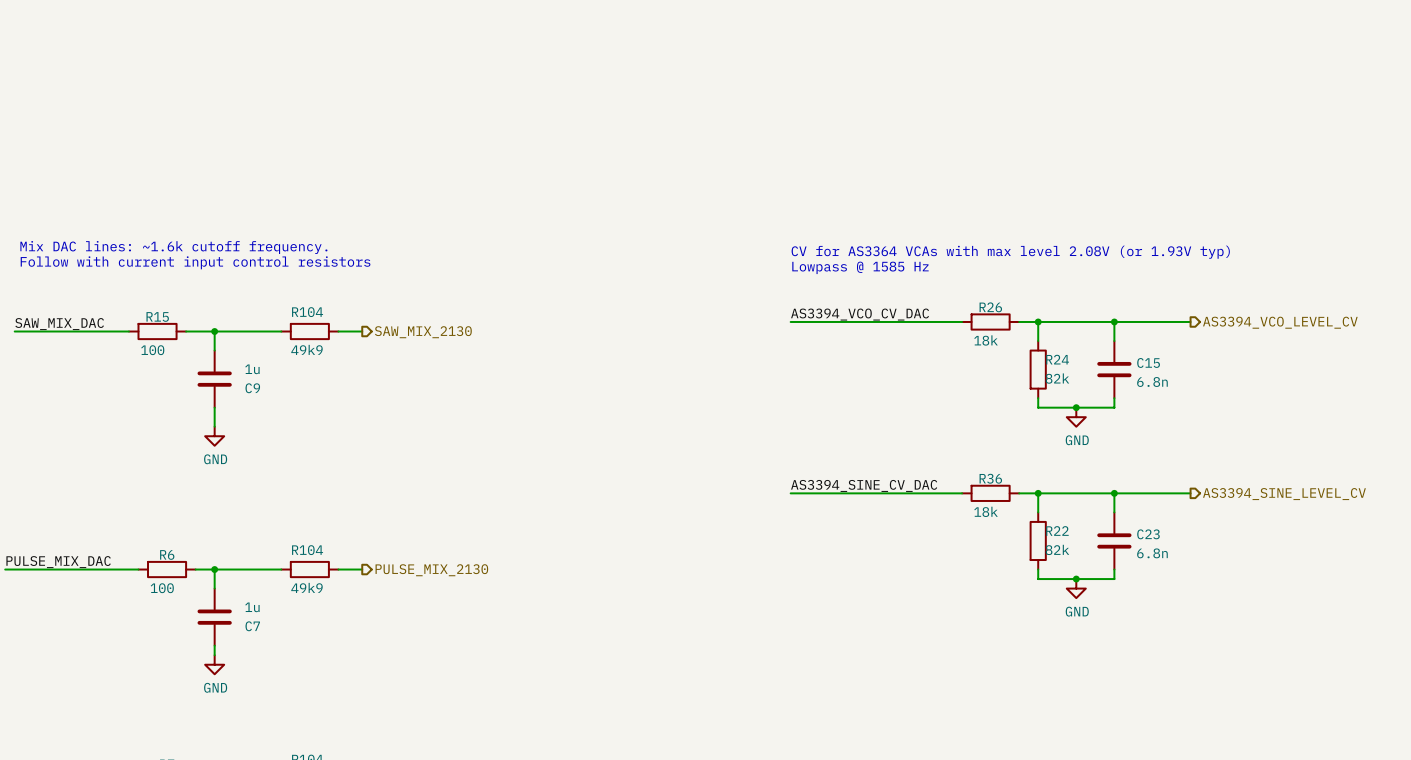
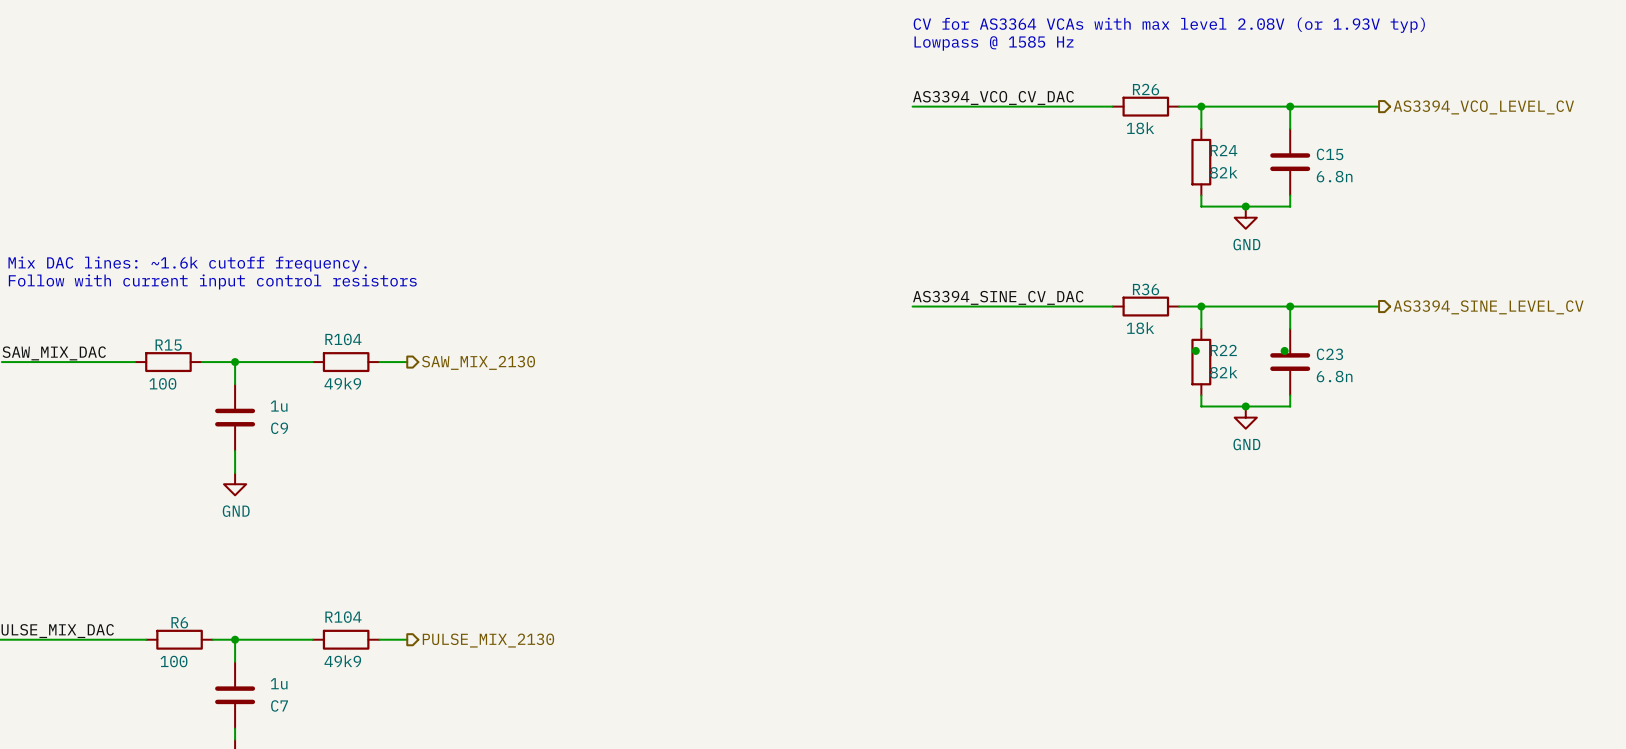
text: none -> CV for AS3364 VCAs with max level 2.08V (or 1.93V typ) (1169, 25)
text: none -> Lowpass @ 1585 Hz (994, 43)
label: none -> AS3394_VCO_CV_DAC (993, 97)
wire: none -> (912, 106) (1112, 106)
wire: none -> (1179, 106) (1379, 106)
wire: none -> (1201, 106) (1201, 128)
junction: none -> (1201, 106)
wire: none -> (1290, 106) (1290, 128)
junction: none -> (1290, 106)
hierarchical label: none -> AS3394_VCO_LEVEL_CV (1483, 107)
wire: none -> (1201, 195) (1201, 206) (1290, 206) (1290, 195)
junction: none -> (1245, 206)
power symbol: none -> GND (1245, 217)
text: CV for AS3364 VCAs with max level 2.08V (or 1.93V typ) (1010, 252) -> none
text: Lowpass @ 1585 Hz (860, 267) -> none
label: none -> AS3394_SINE_CV_DAC (998, 297)
junction: none -> (1201, 306)
junction: none -> (1290, 306)
hierarchical label: none -> AS3394_SINE_LEVEL_CV (1488, 307)
label: AS3394_VCO_CV_DAC (860, 314) -> none
wire: (790, 321) (962, 321) -> (912, 306) (1112, 306)
R26 position: (990, 321) -> (1145, 106)
wire: (1019, 321) (1190, 321) -> (1179, 306) (1379, 306)
wire: (1038, 321) (1038, 341) -> (1201, 306) (1201, 328)
wire: (1114, 321) (1114, 341) -> (1290, 306) (1290, 328)
hierarchical label: AS3394_VCO_LEVEL_CV (1280, 322) -> none
R24 position: (1038, 369) -> (1201, 162)
C15 position: (1114, 369) -> (1290, 162)
wire: (1038, 398) (1038, 407) (1114, 407) (1114, 398) -> (1201, 395) (1201, 406) (1290, 406) (1290, 395)
junction position: (1076, 407) -> (1245, 406)
power symbol position: GND (1076, 417) -> GND (1245, 417)
label: AS3394_SINE_CV_DAC (864, 485) -> none
wire: (790, 493) (962, 493) -> none
R36 position: (990, 493) -> (1145, 306)
wire: (1019, 493) (1190, 493) -> none
wire: (1038, 493) (1038, 512) -> none
junction: (1038, 493) -> none
wire: (1114, 493) (1114, 512) -> none
junction: (1114, 493) -> none
hierarchical label: AS3394_SINE_LEVEL_CV (1284, 494) -> none
R22 position: (1038, 540) -> (1201, 362)
C23 position: (1114, 540) -> (1290, 362)
wire: (1038, 569) (1038, 579) (1114, 579) (1114, 569) -> none
junction: (1076, 579) -> none
power symbol: GND (1076, 588) -> none

